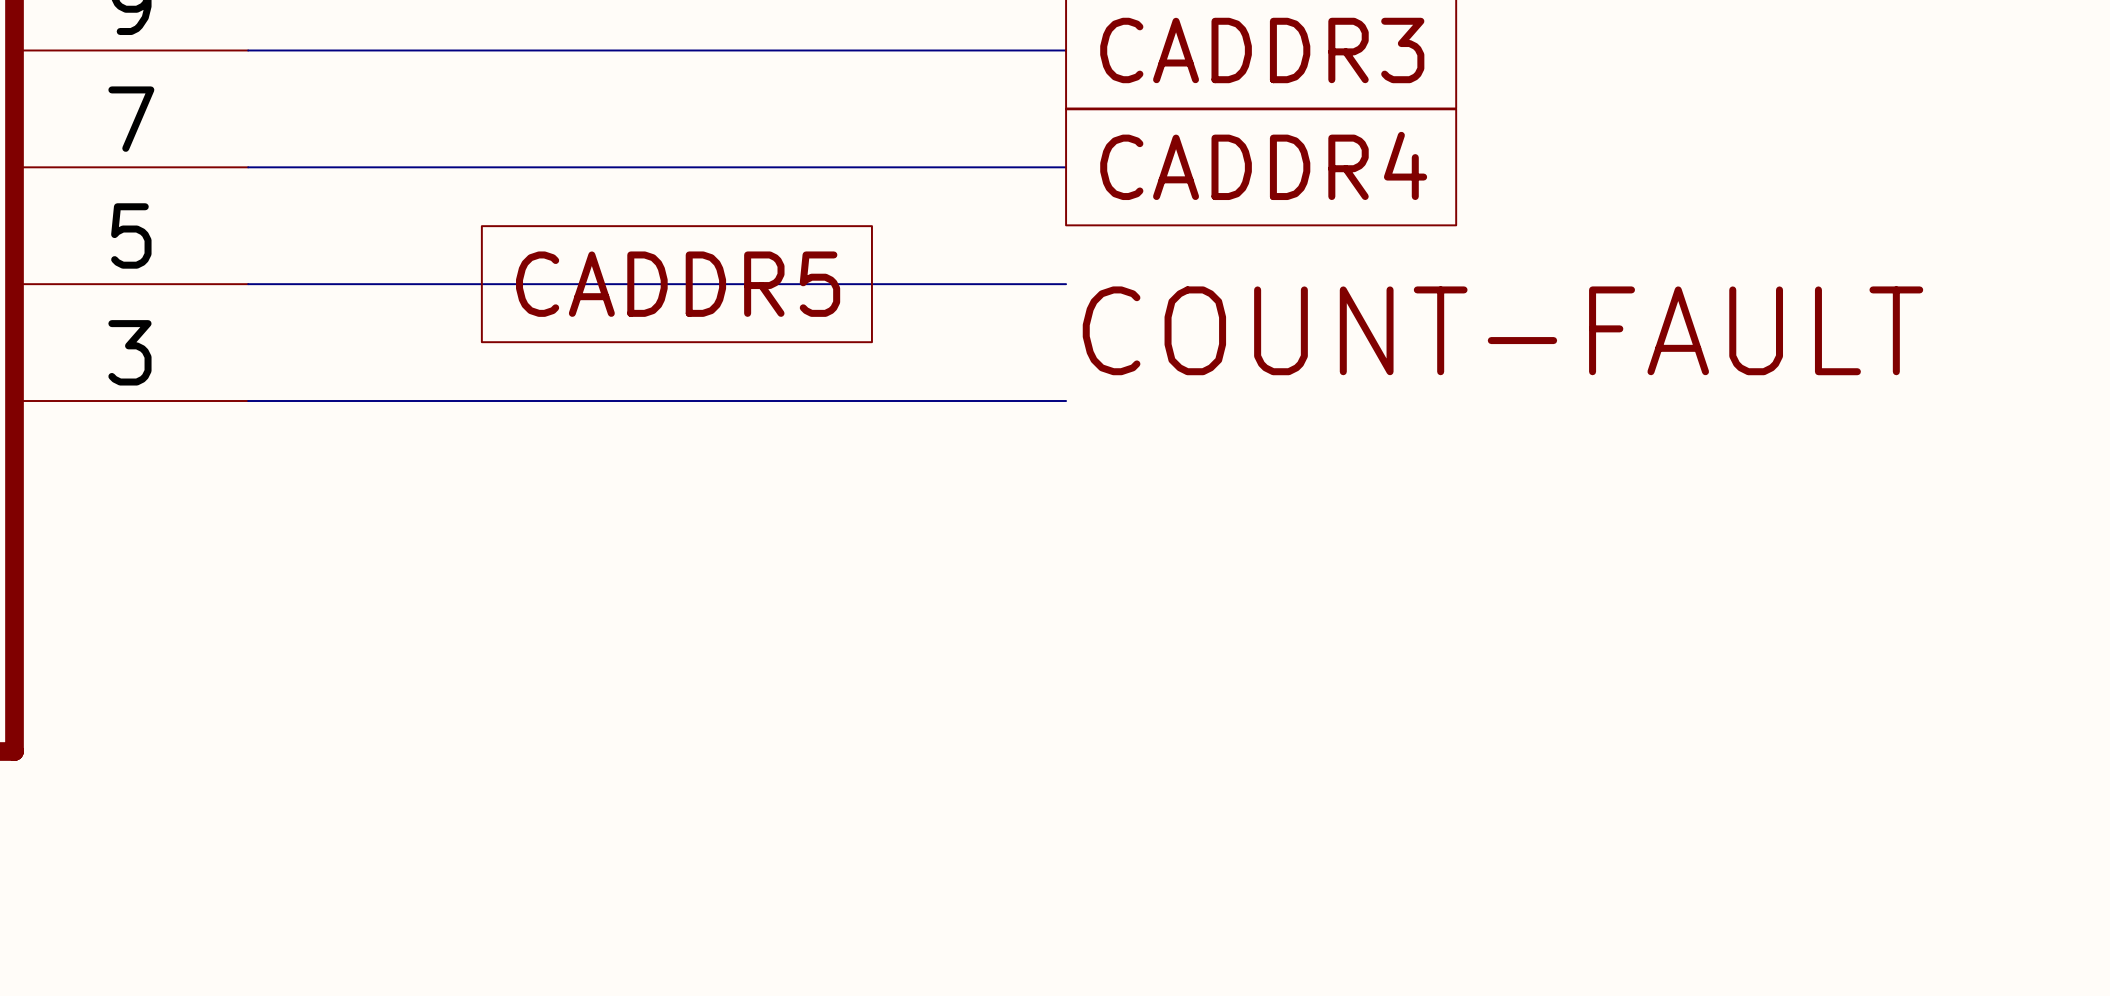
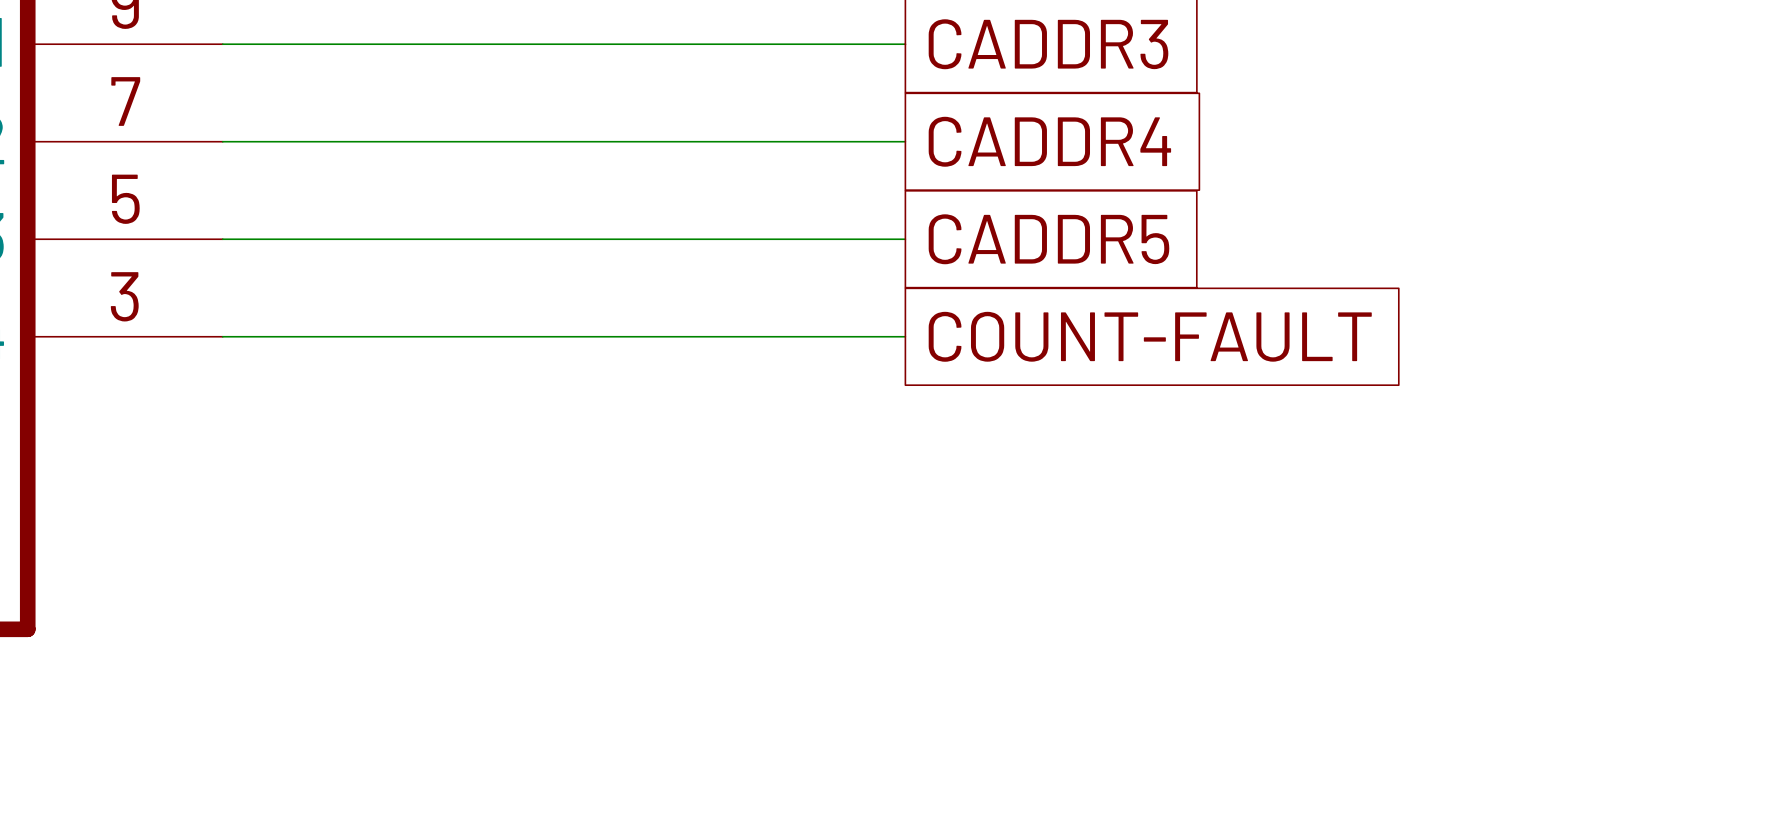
global label position: CADDR5 (678, 284) -> CADDR5 (1048, 239)
label: COUNT-FAULT (1502, 330) -> none
global label: none -> COUNT-FAULT (1150, 336)

